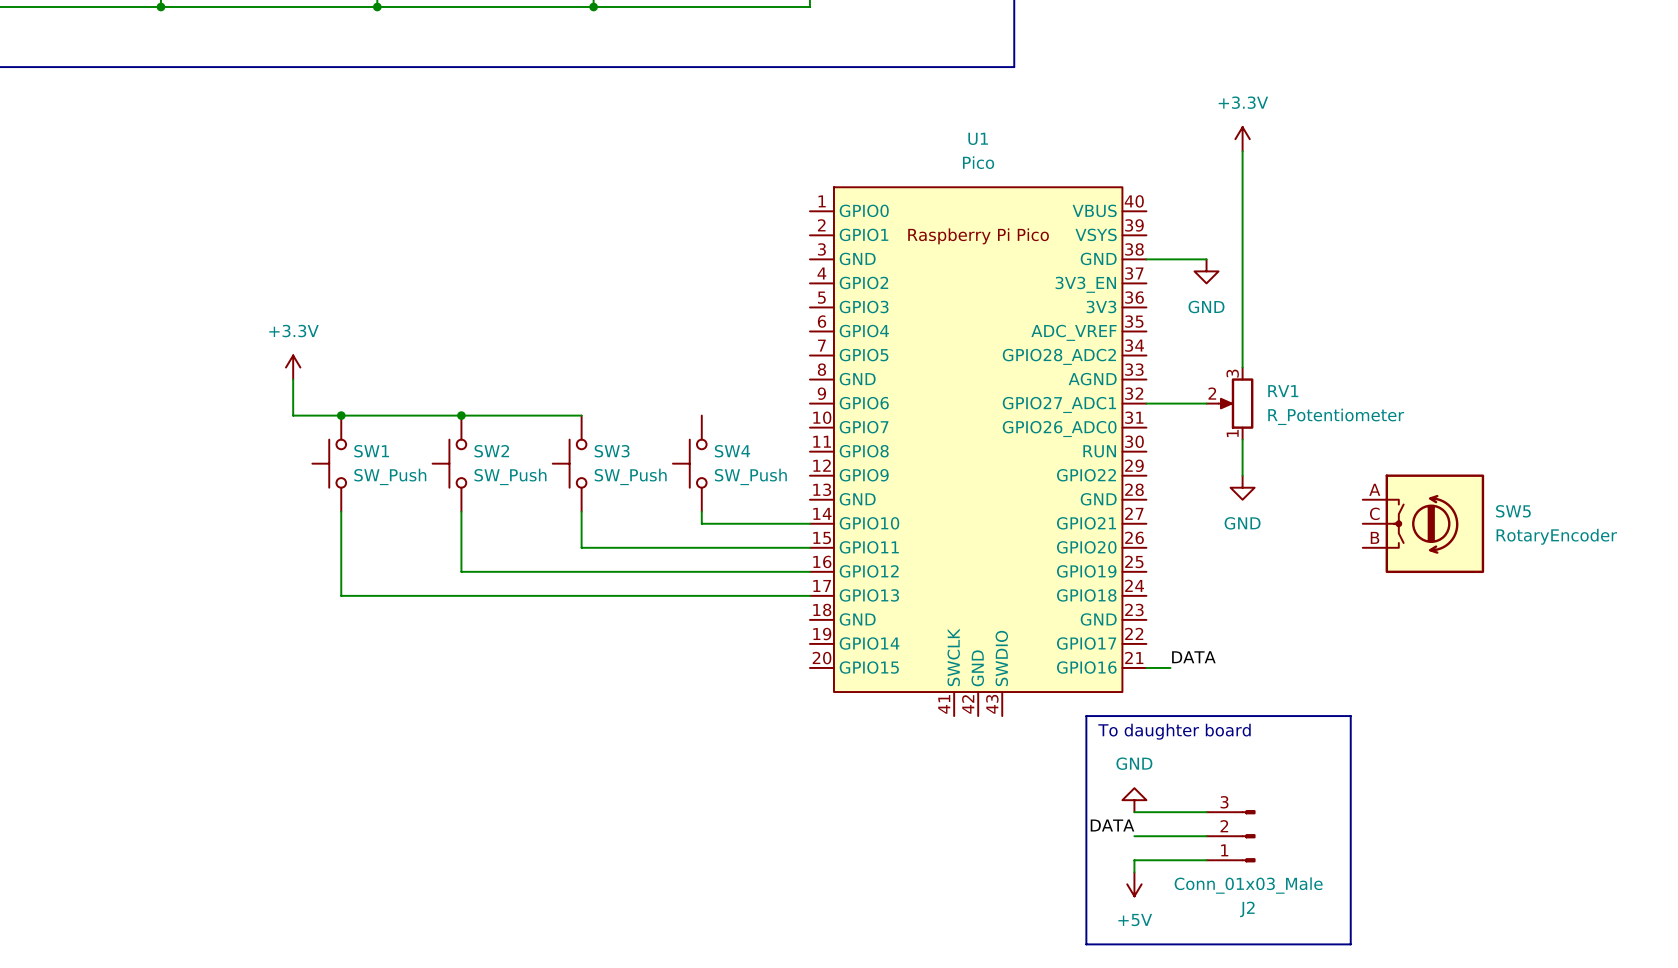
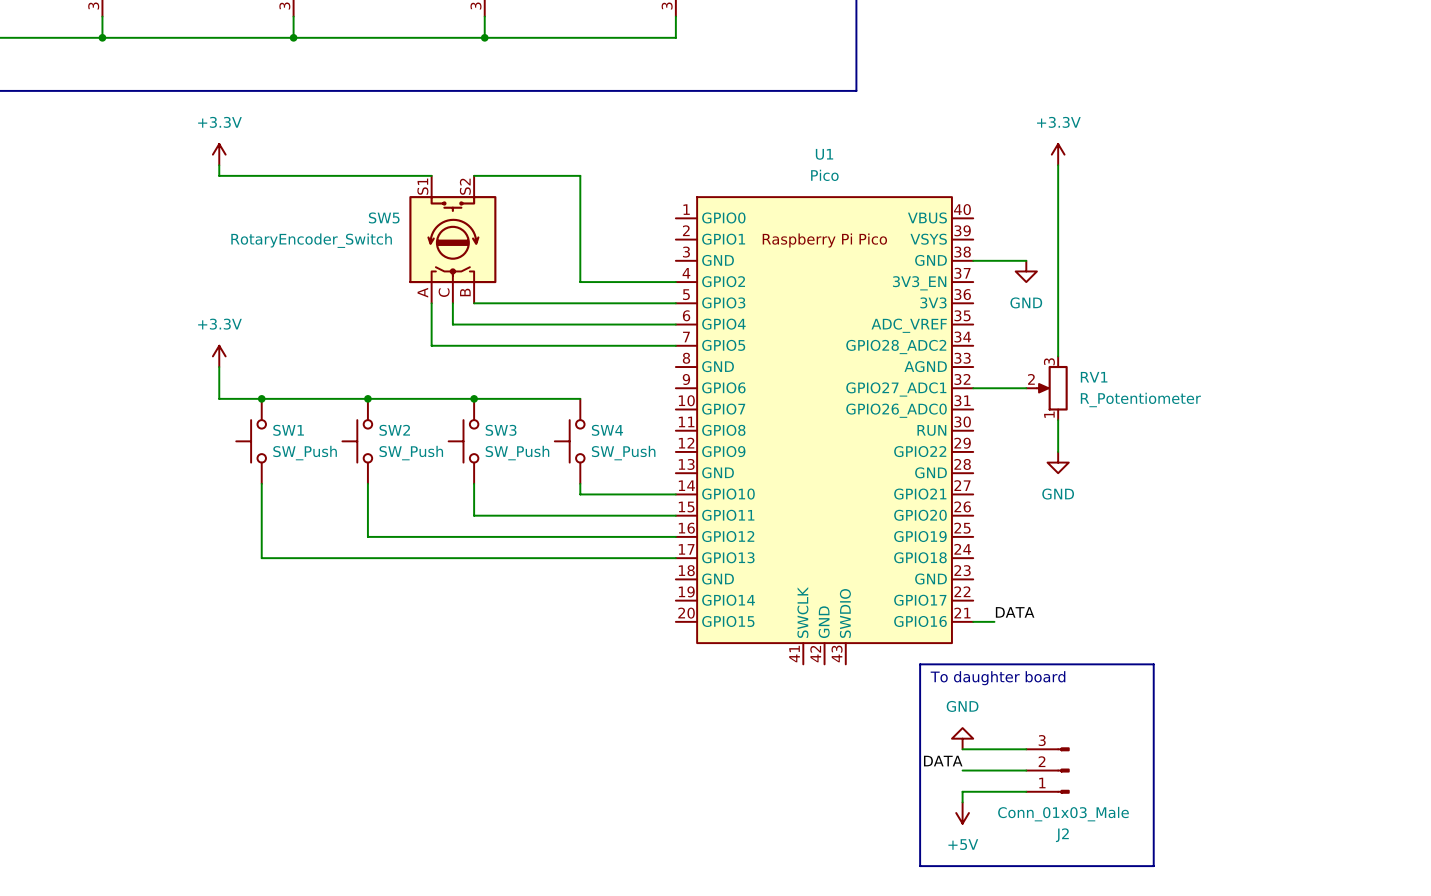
power symbol: none -> +3.3V (219, 154)
wire: none -> (219, 165) (219, 175) (431, 175)
wire: none -> (474, 175) (580, 175) (580, 282) (675, 282)
wire: none -> (431, 303) (431, 345) (675, 345)
wire: none -> (452, 303) (452, 324) (675, 324)
wire: none -> (474, 303) (675, 303)
wire: none -> (474, 398) (580, 398)
junction: none -> (474, 398)
SW5 symbol: [1362, 474, 1485, 574] -> [409, 175, 497, 304]
SW5 name position: SW5 (1513, 511) -> SW5 (384, 217)
SW5 value: RotaryEncoder (1556, 536) -> RotaryEncoder_Switch (311, 240)

